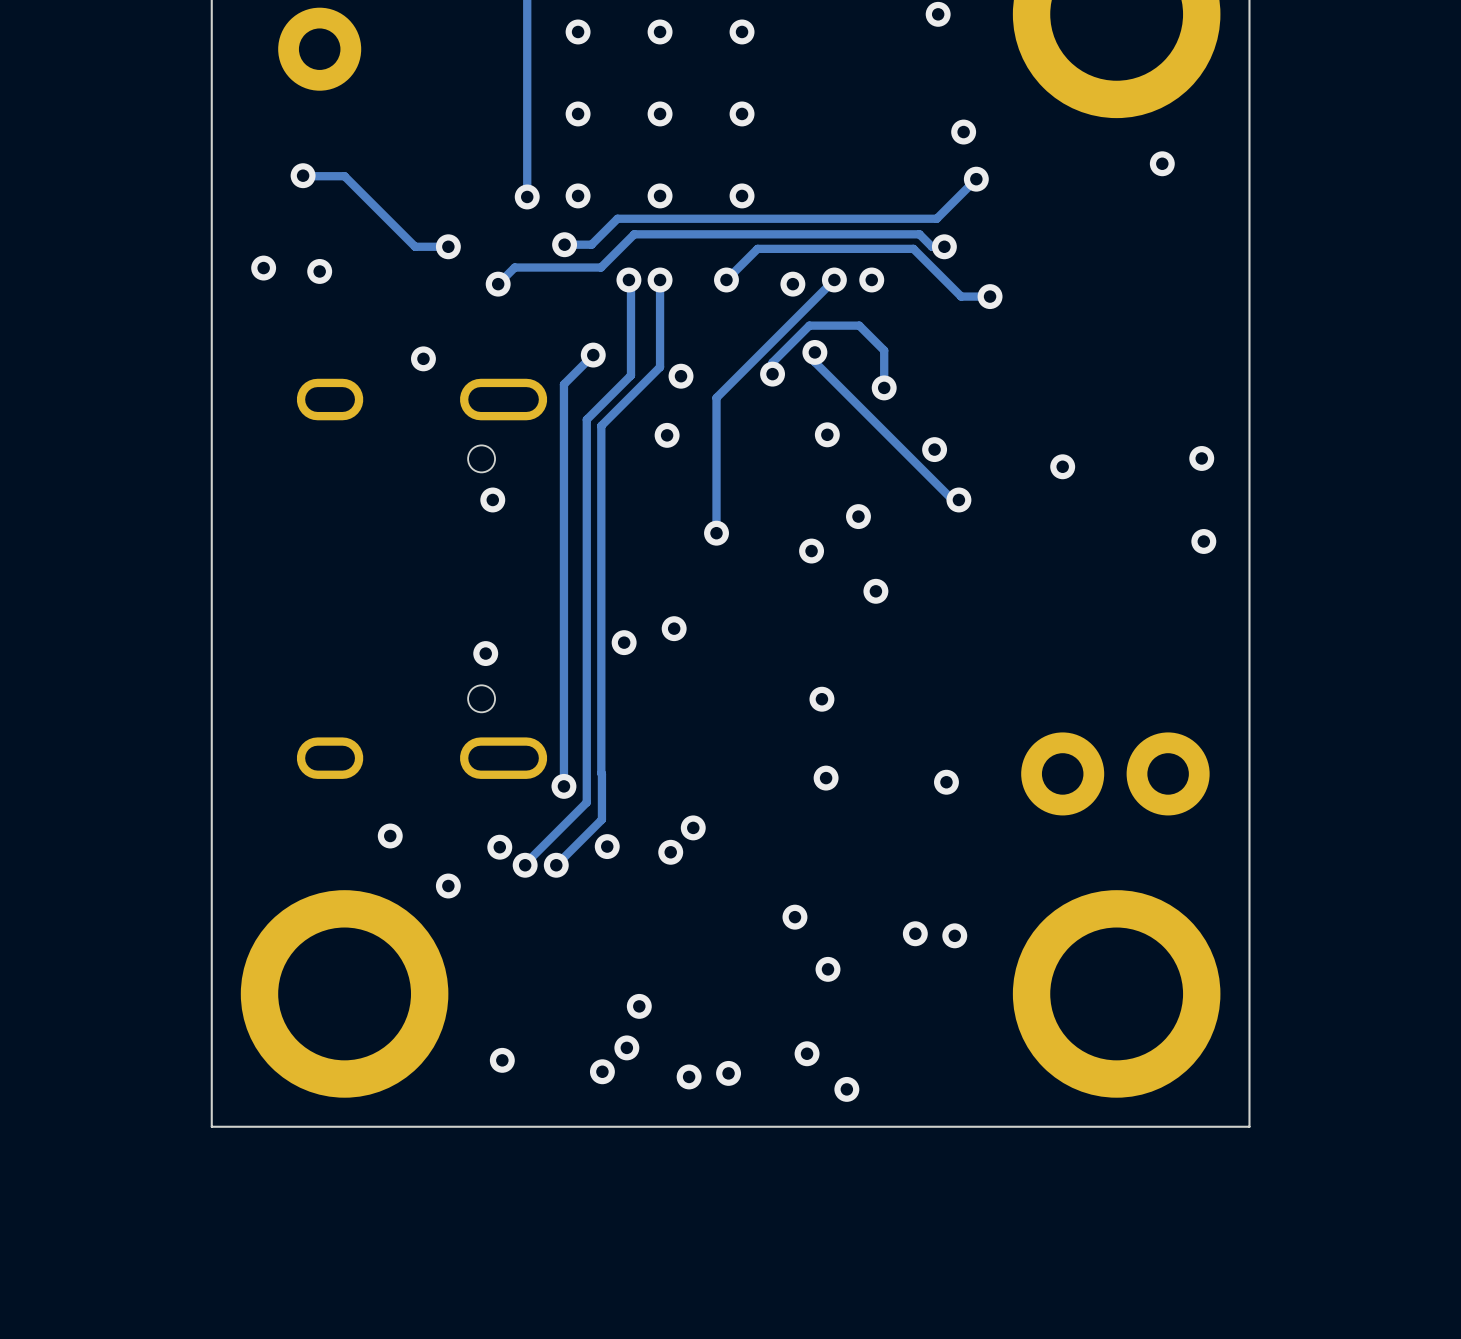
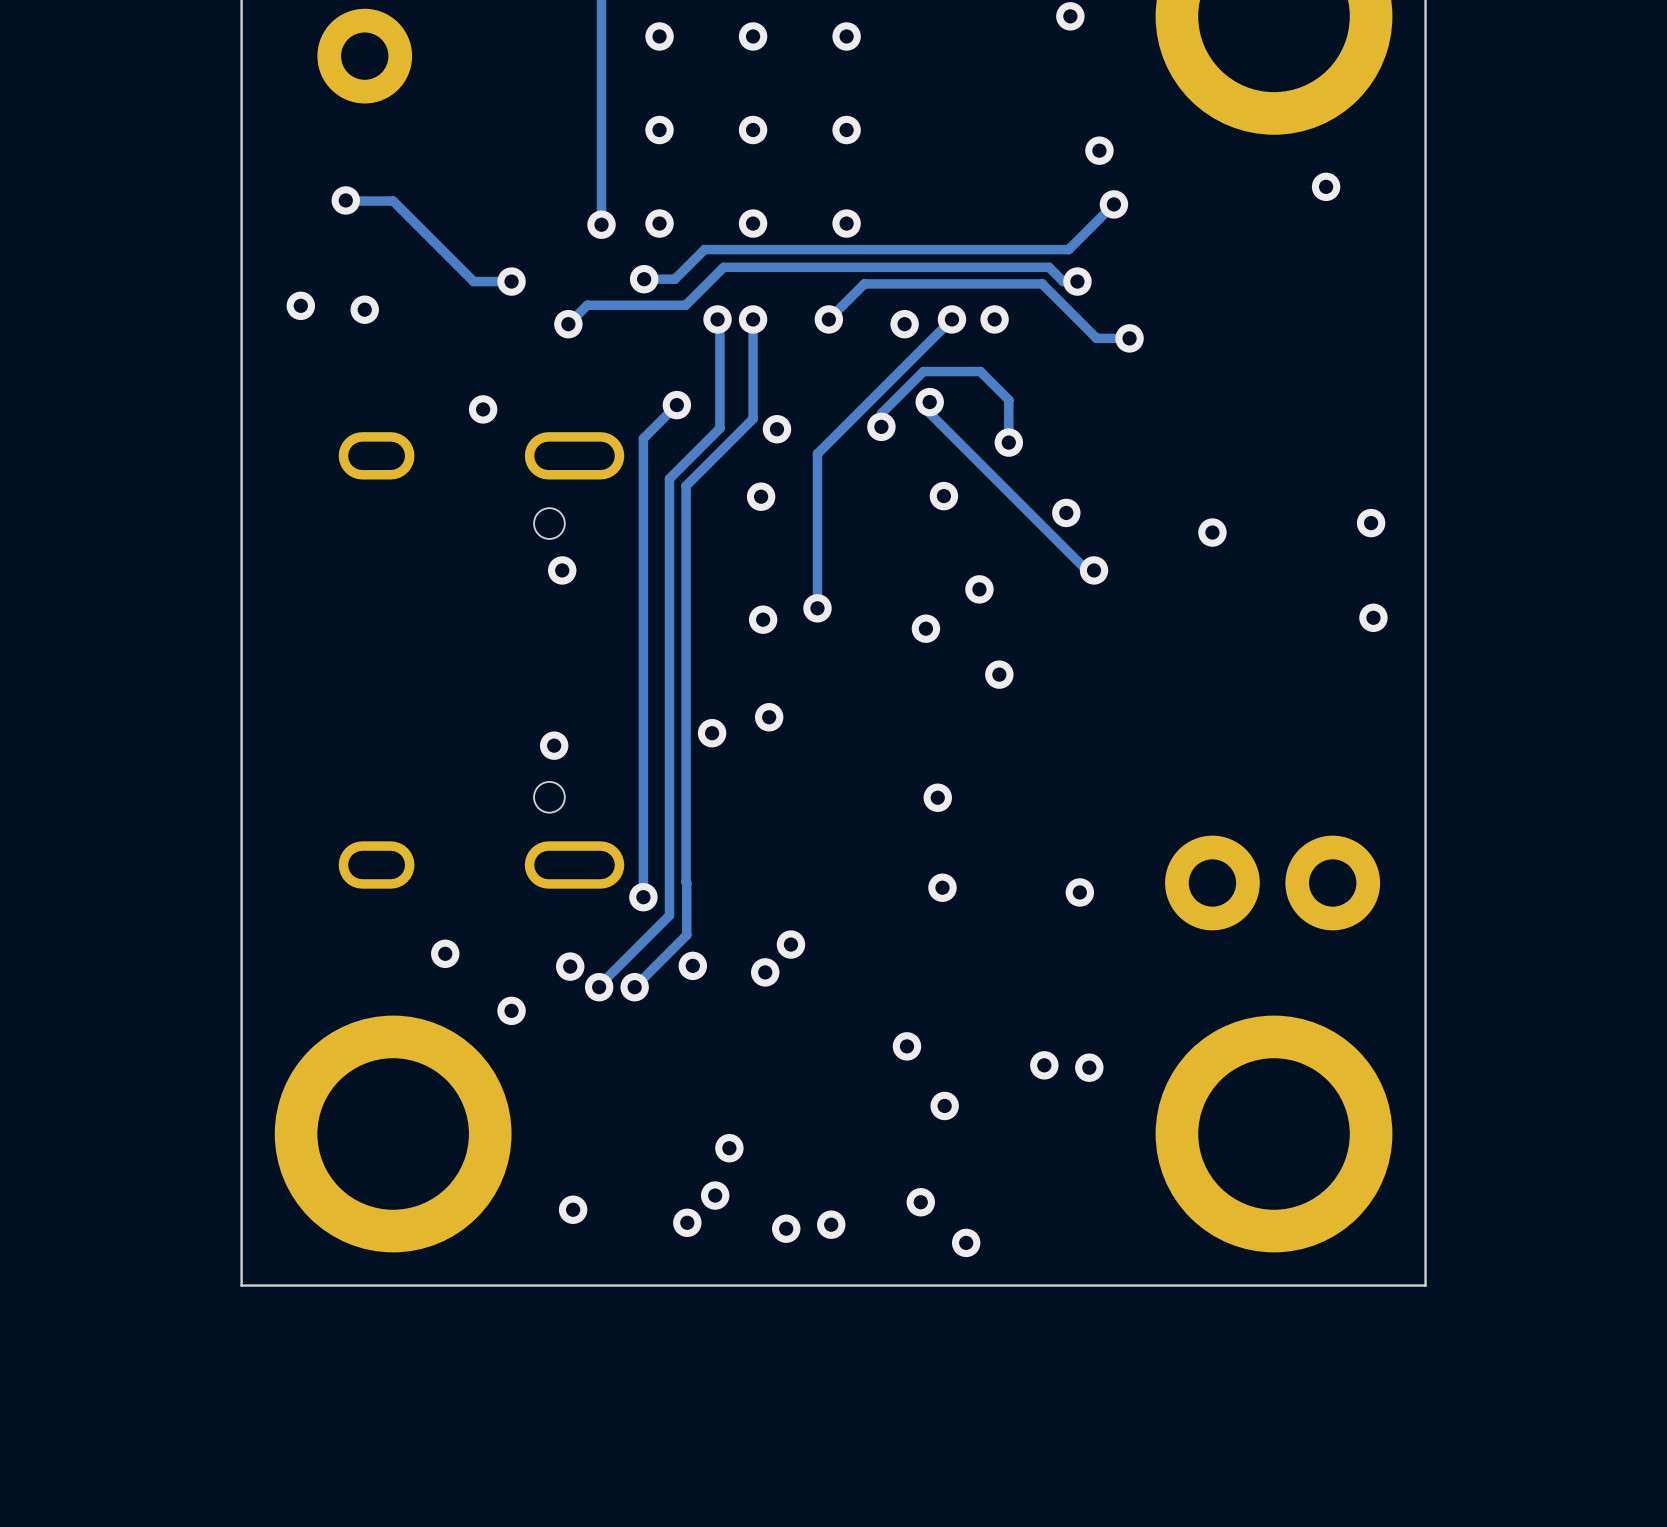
via: none -> (763, 619)

